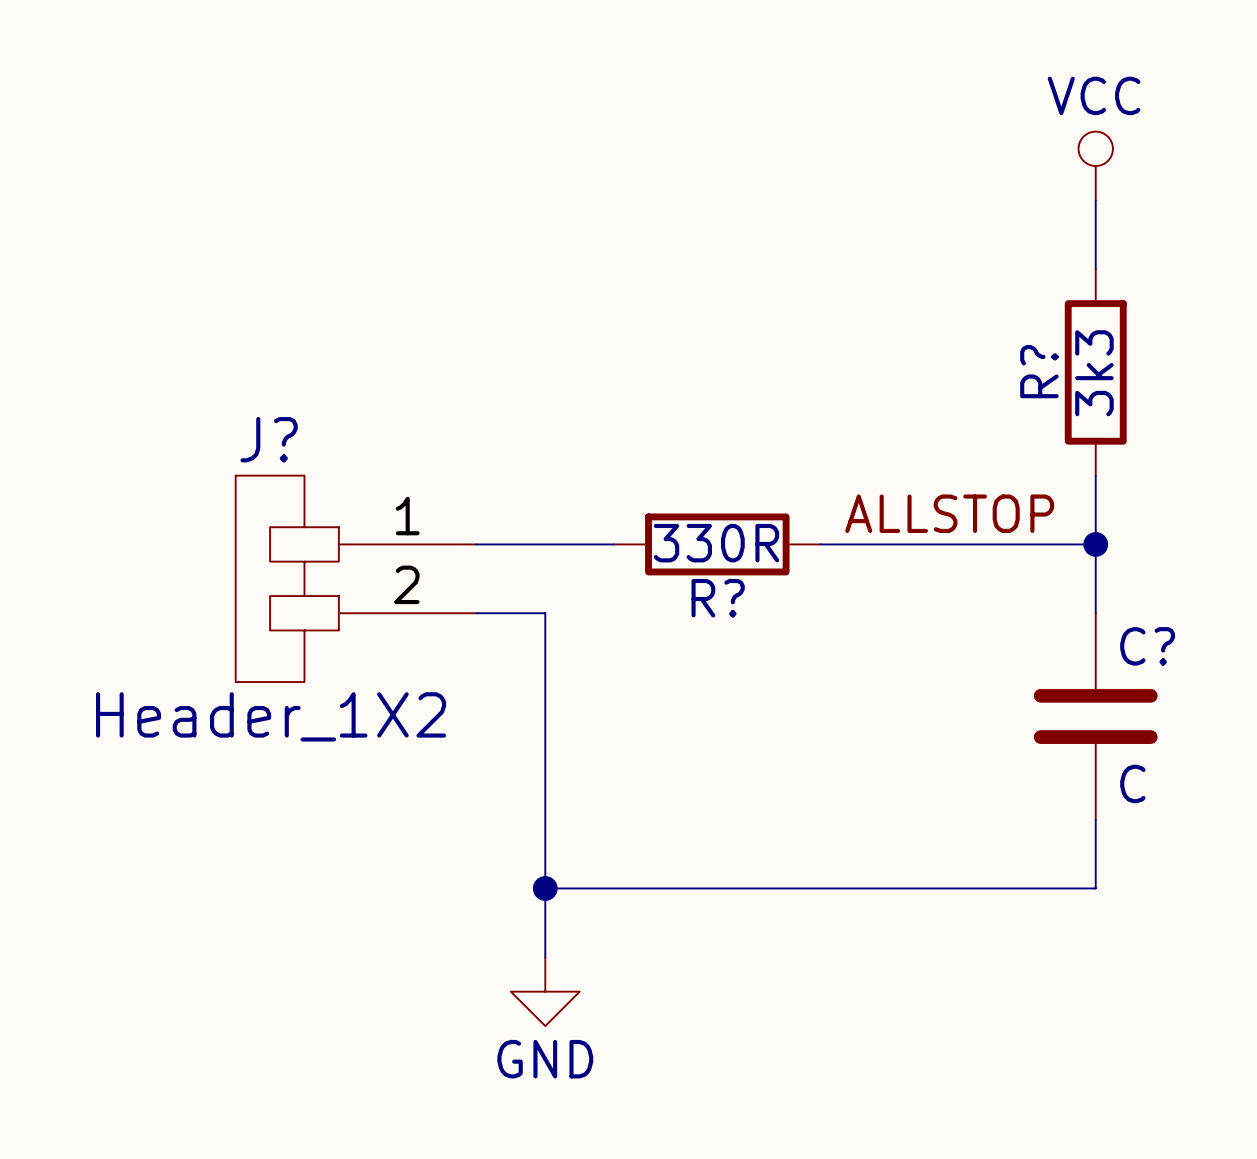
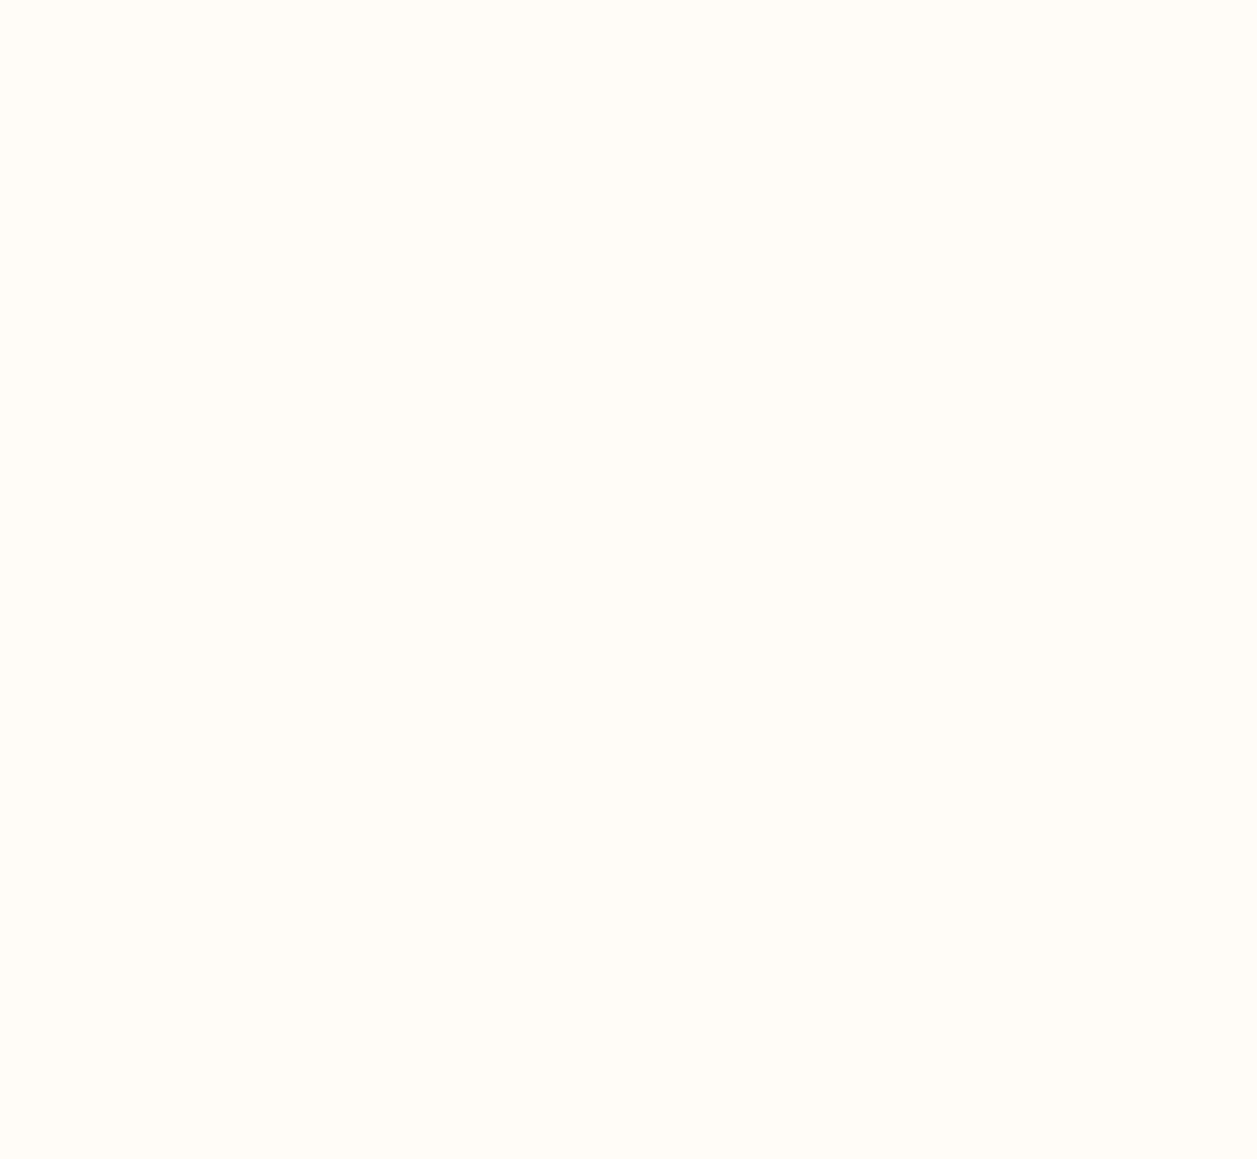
power symbol: VCC (1095, 166) -> none
wire: (1095, 200) (1095, 269) -> none
R?: 3k3 (1095, 372) -> none
wire: (1095, 475) (1095, 613) -> none
label: ALLSTOP (949, 513) -> none
wire: (476, 544) (614, 544) -> none
R?: 330R (717, 544) -> none
wire: (820, 544) (1095, 544) -> none
junction: (1095, 544) -> none
J?: Header_1X2 (356, 578) -> none
wire: (476, 613) (545, 613) (545, 957) -> none
C?: C (1095, 716) -> none
wire: (1095, 819) (1095, 888) (545, 888) -> none
junction: (545, 888) -> none
power symbol: GND (545, 991) -> none

